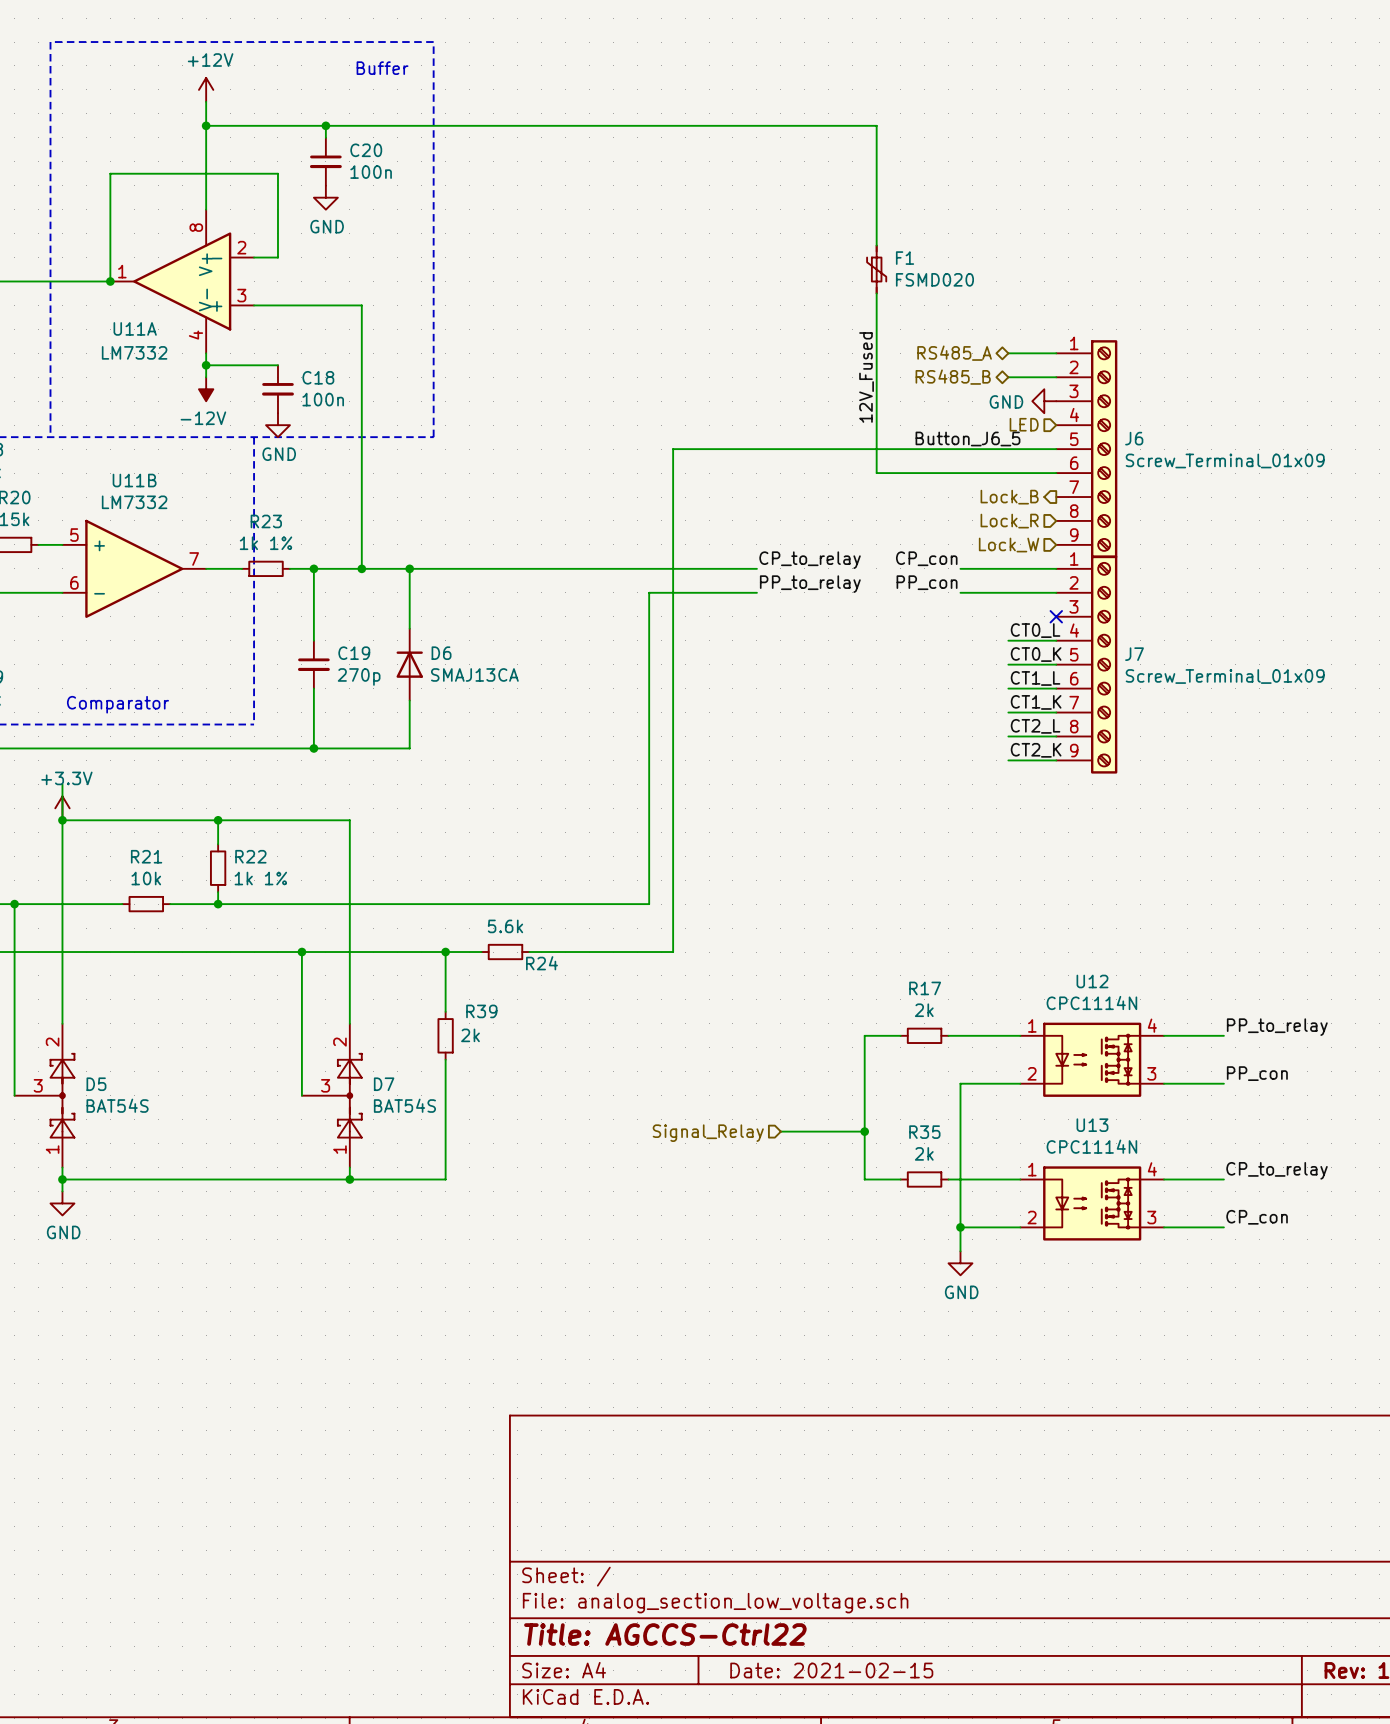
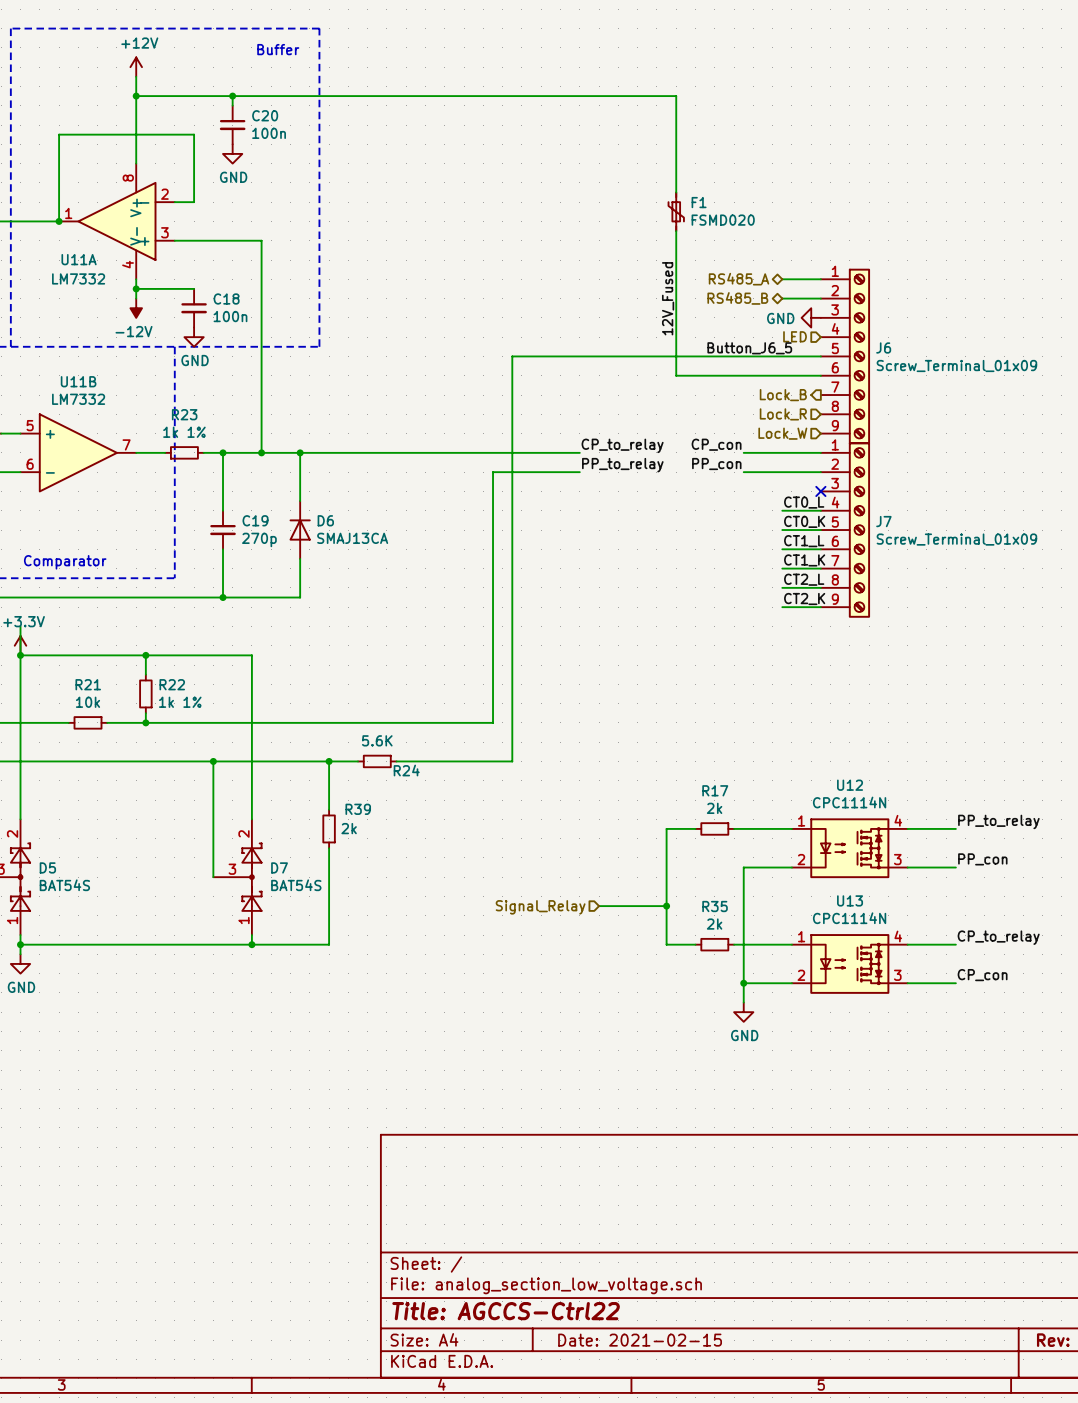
R24 value: 5.6k (505, 926) -> 5.6K (377, 740)

